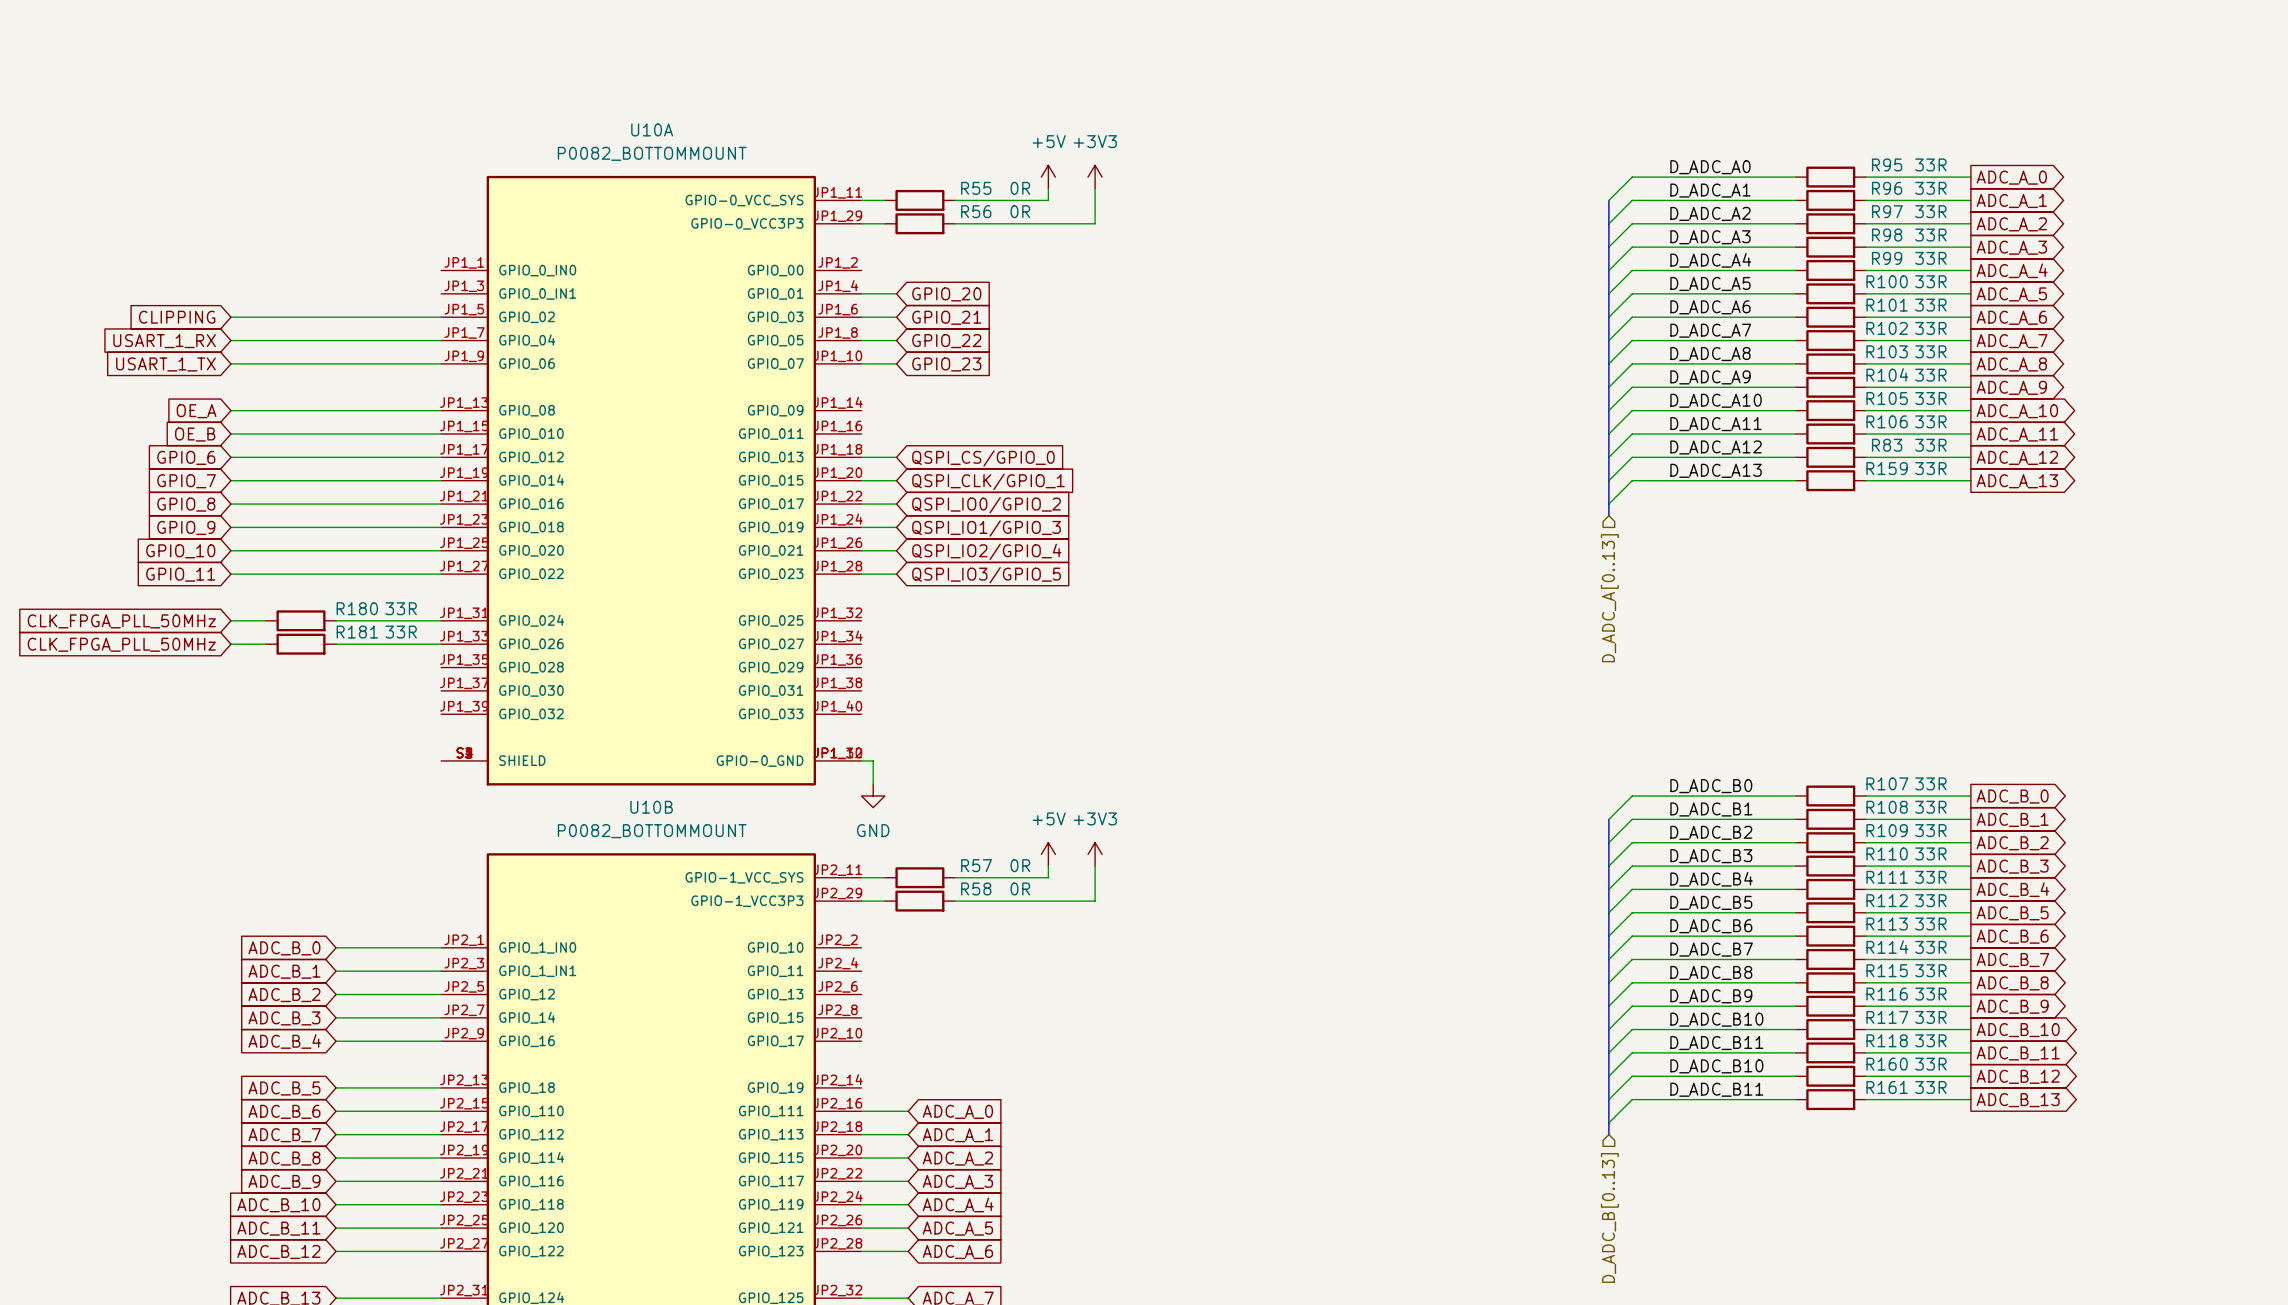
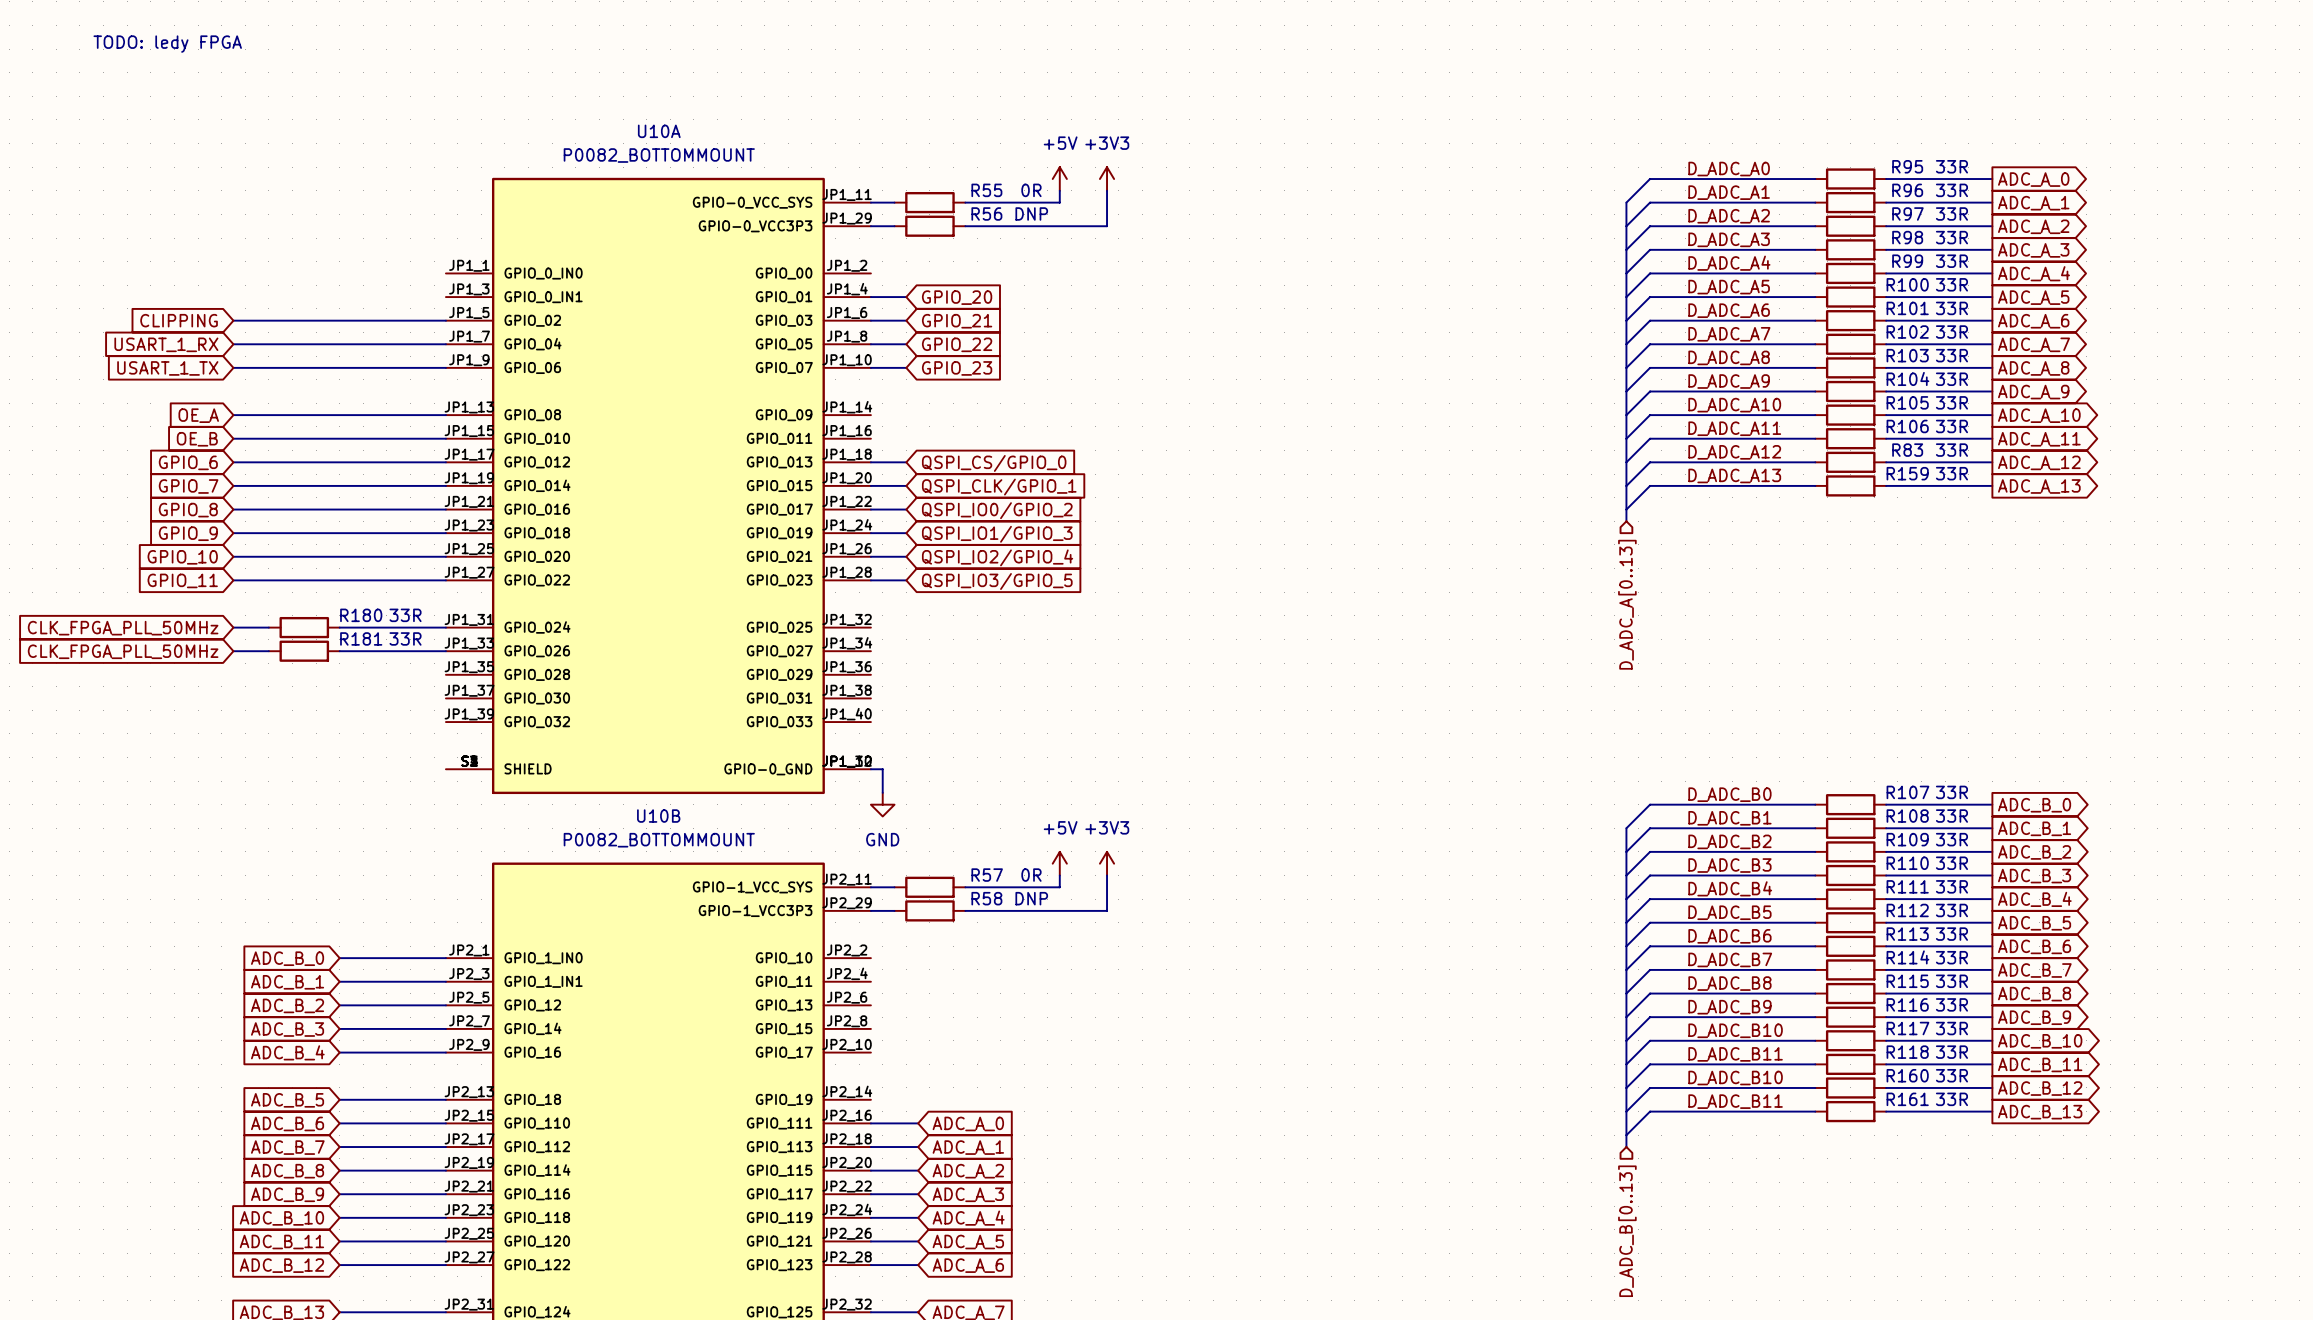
text: none -> TODO: ledy FPGA (167, 44)
R56 value: 0R (1020, 211) -> DNP (1031, 213)
R58 value: 0R (1020, 888) -> DNP (1031, 898)

